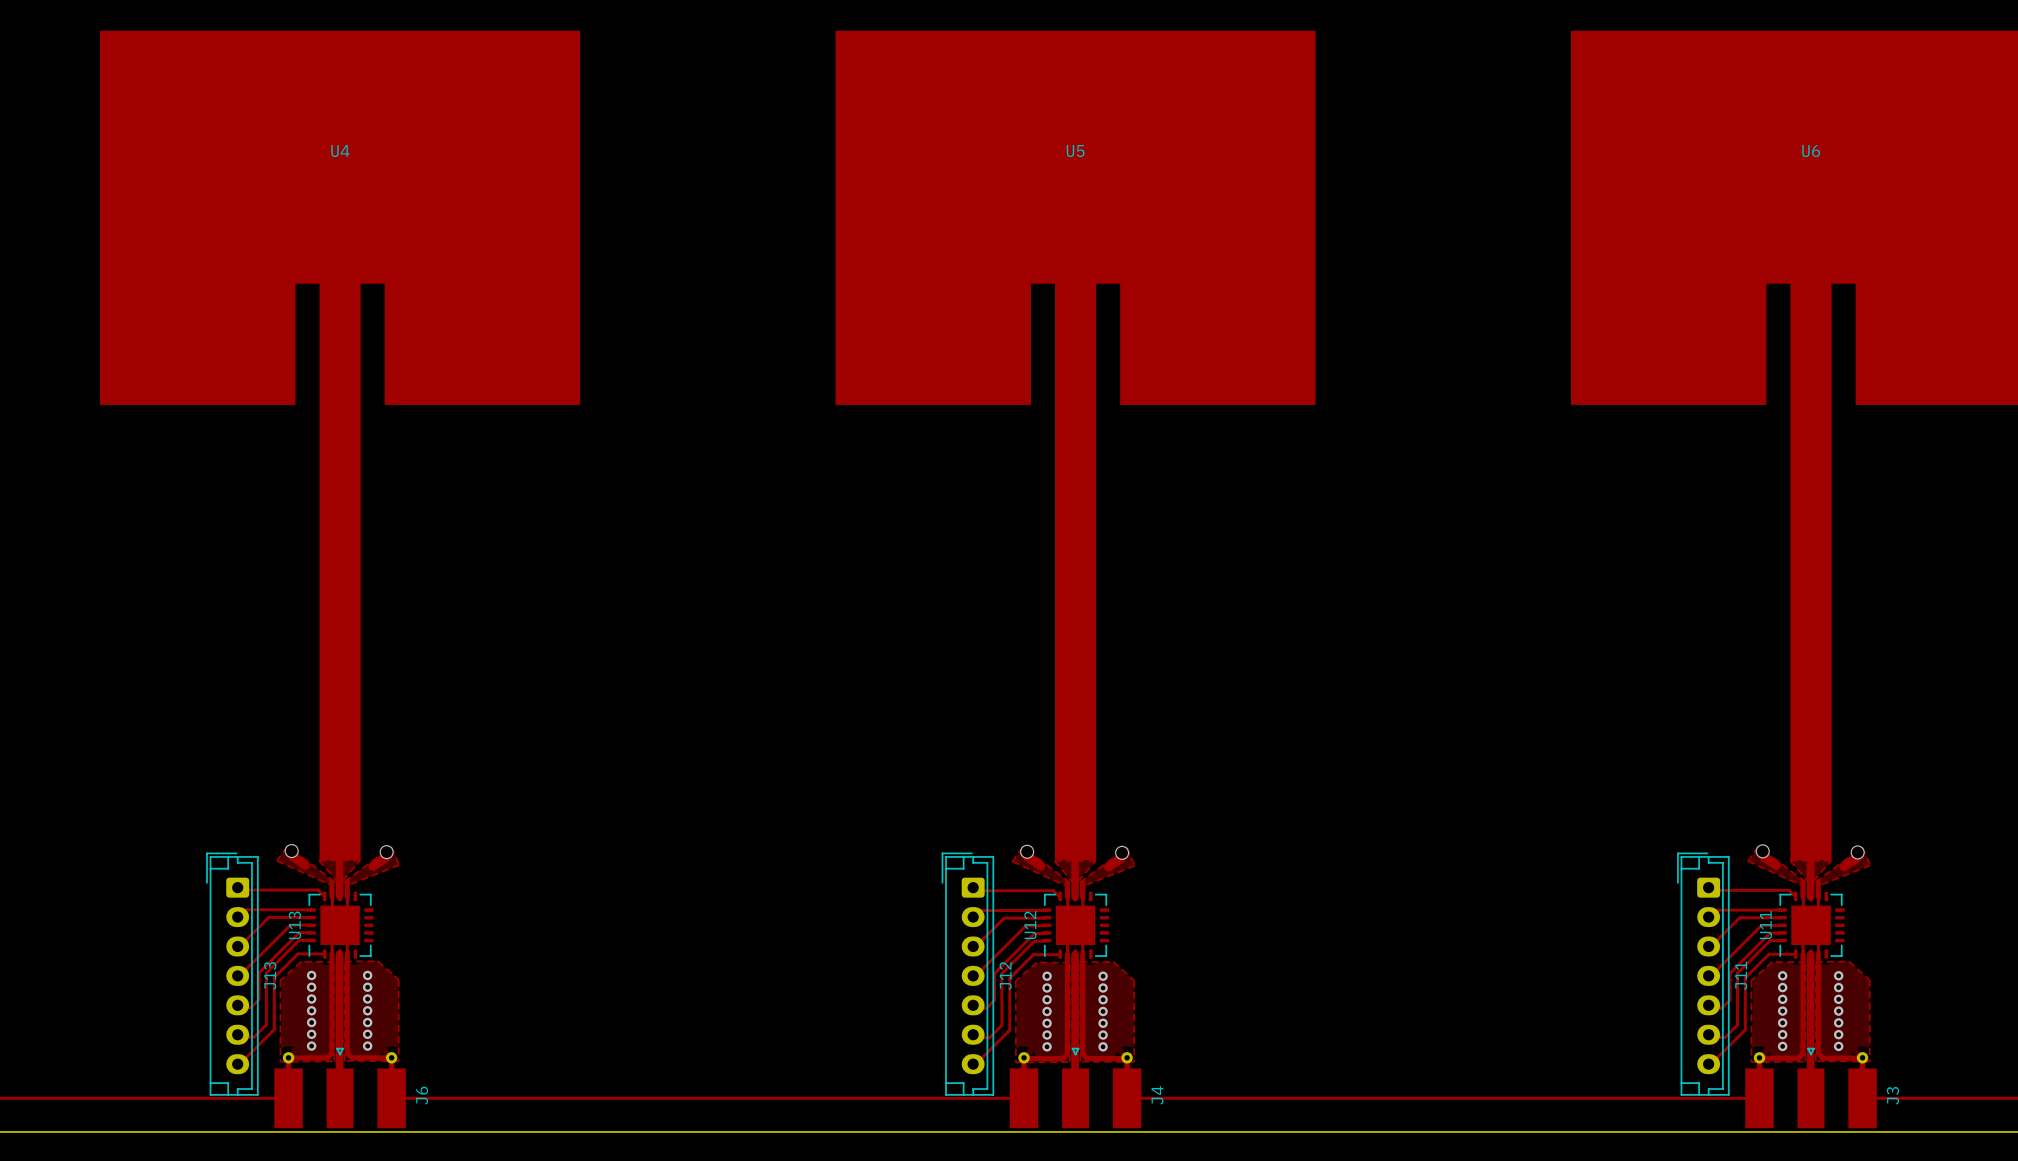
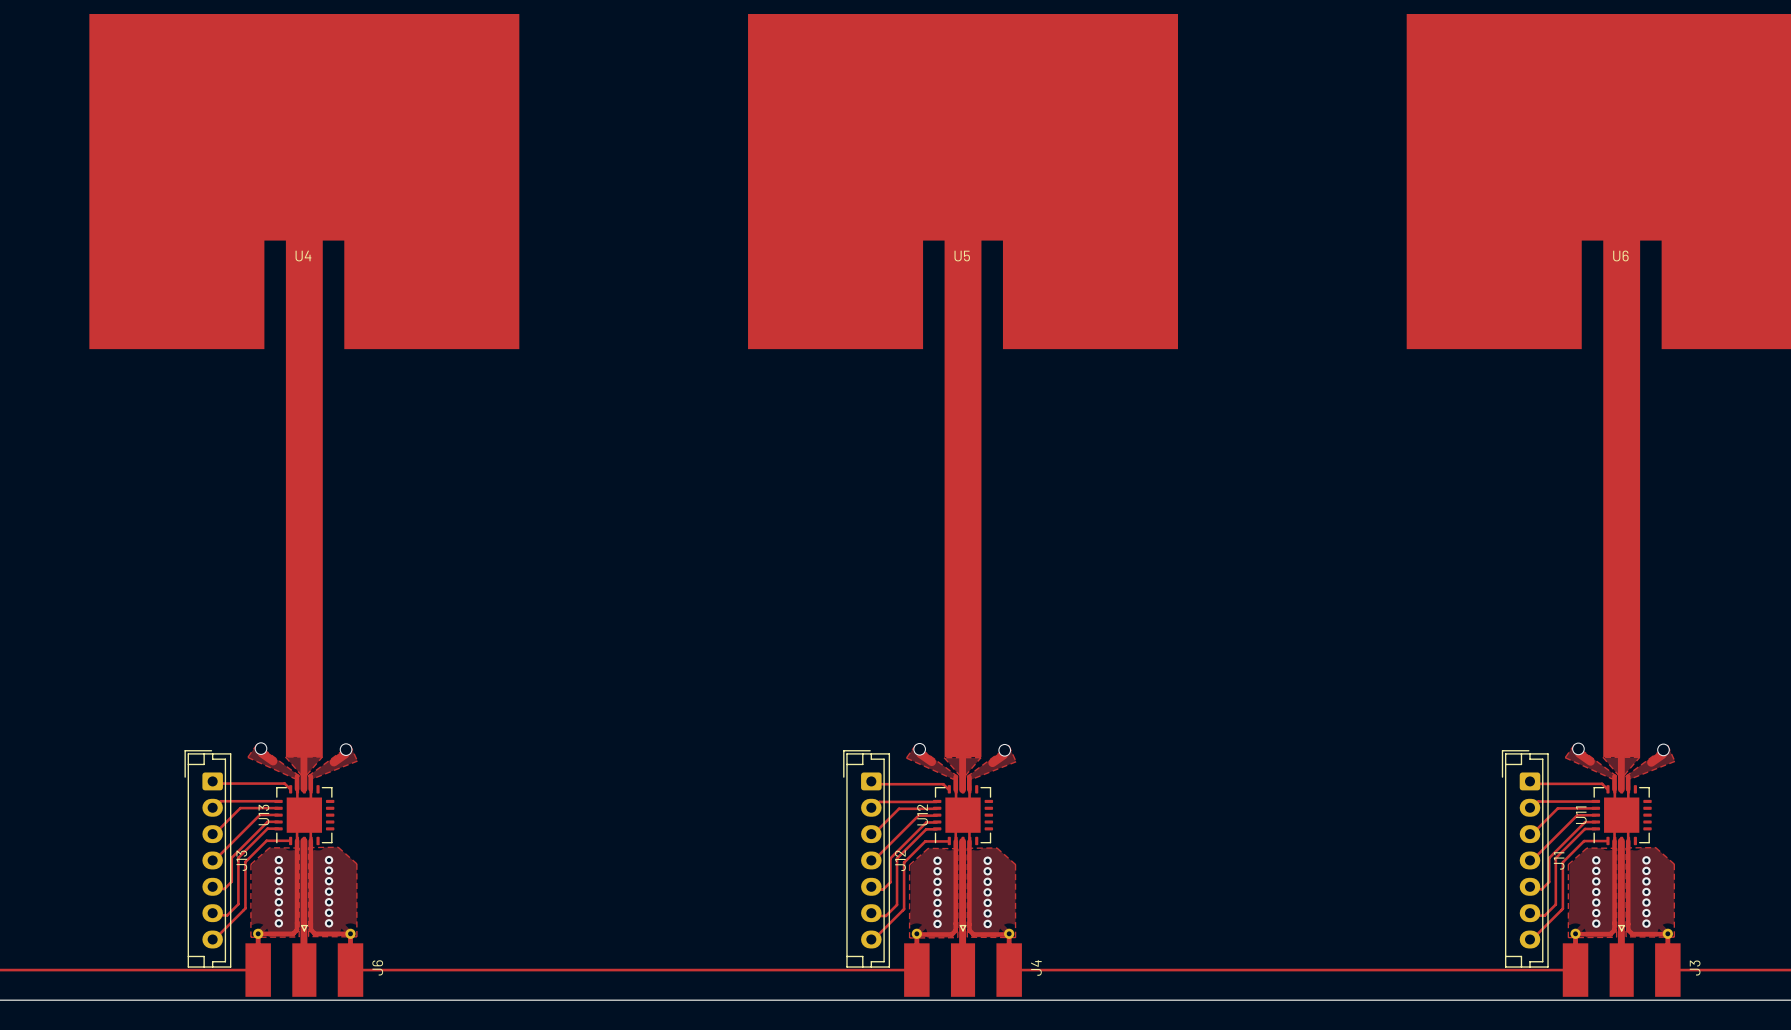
U4 name position: U4 (340, 151) -> U4 (303, 256)
U5 name position: U5 (1075, 151) -> U5 (962, 256)
U6 name position: U6 (1811, 151) -> U6 (1620, 255)

